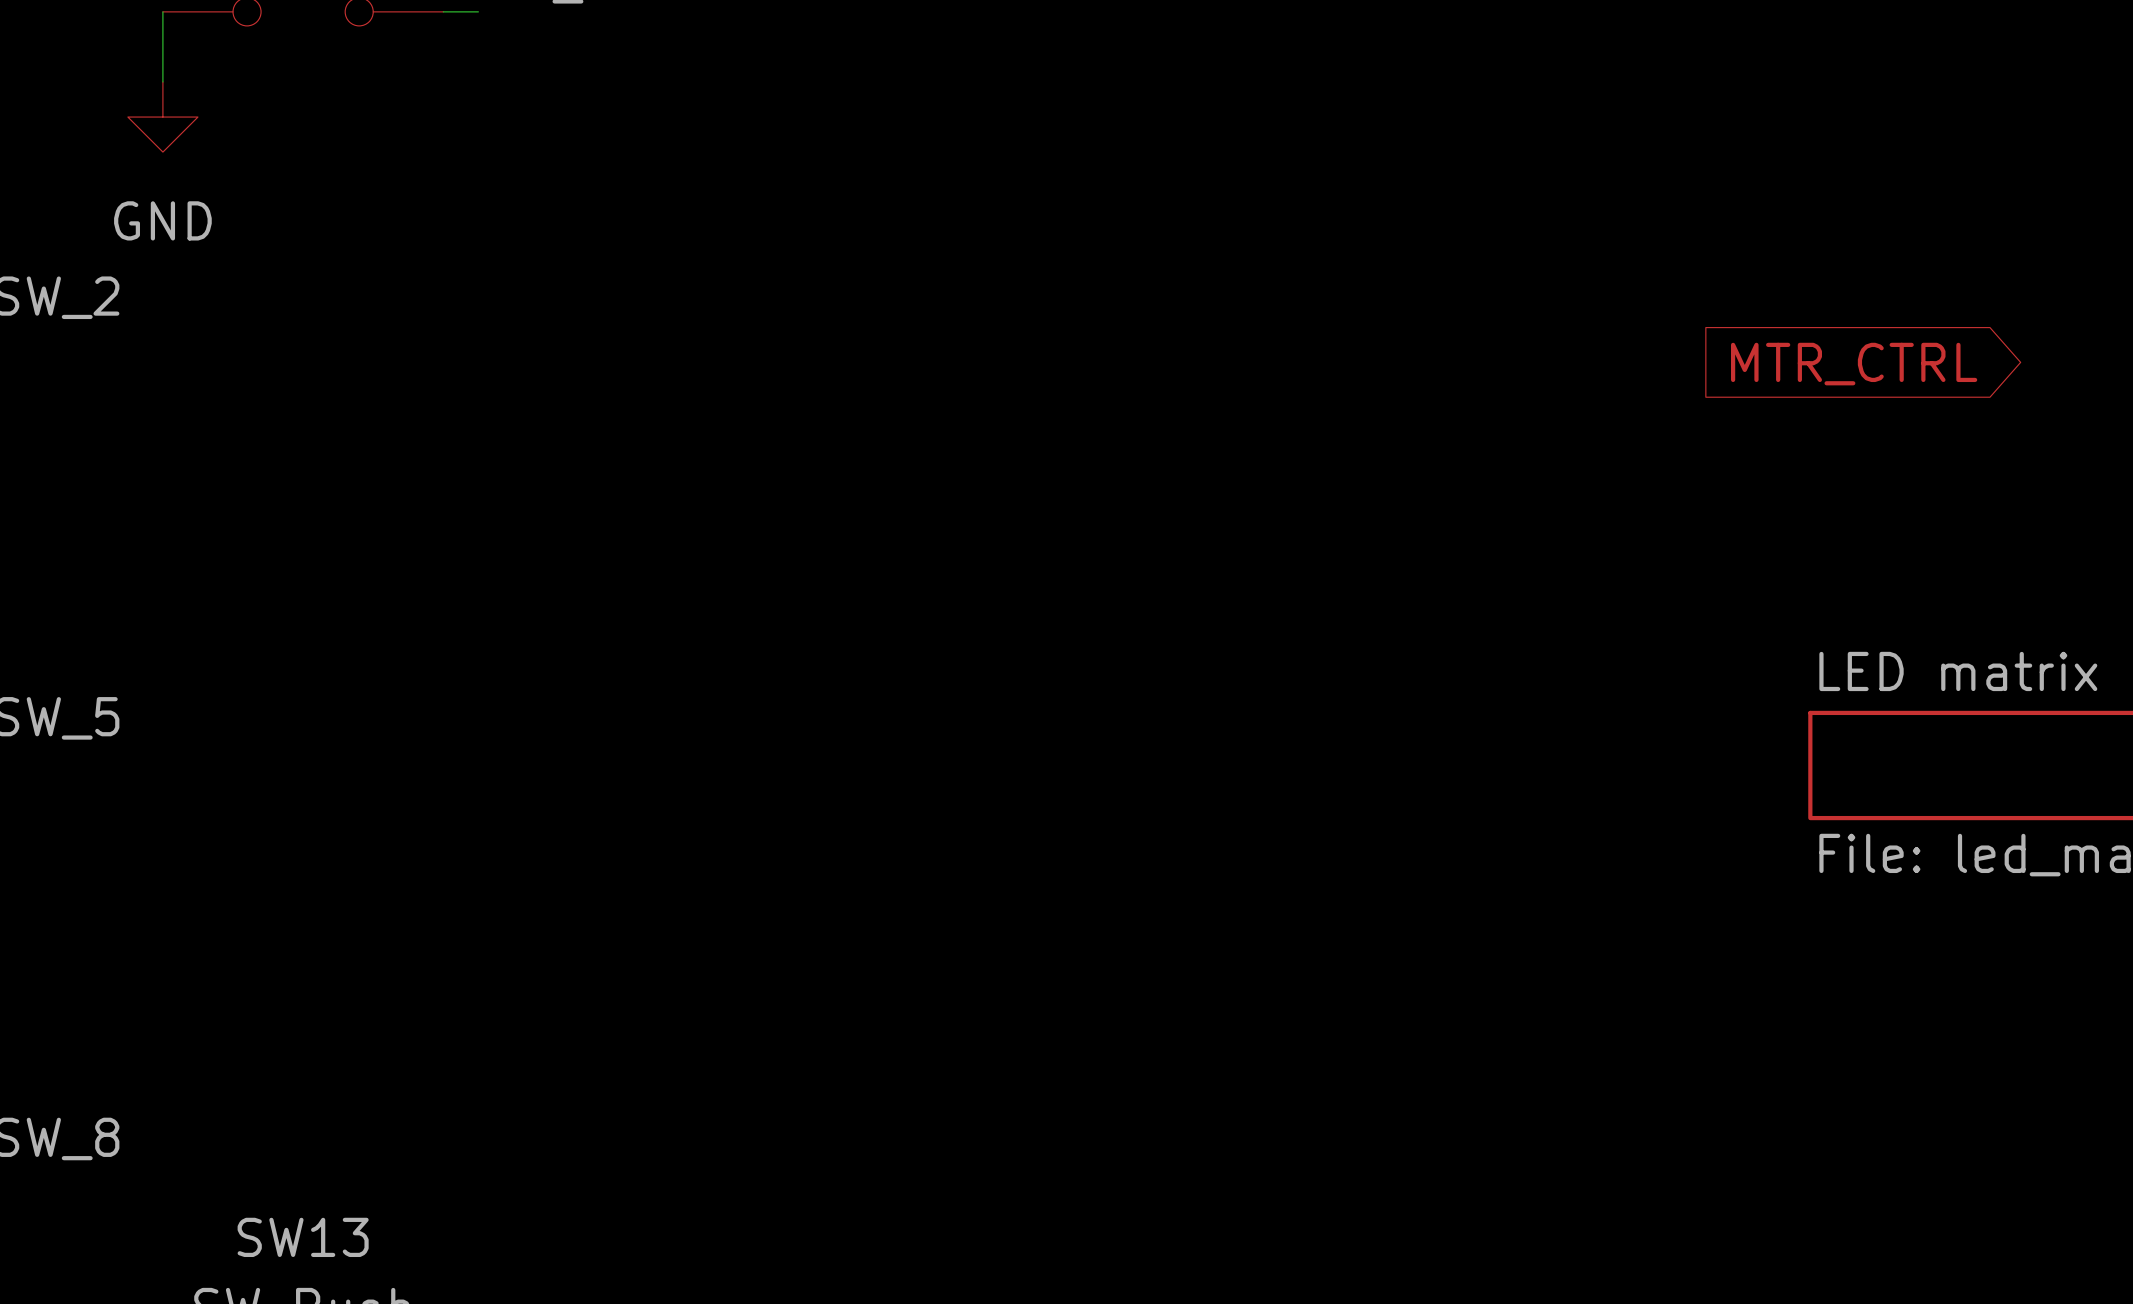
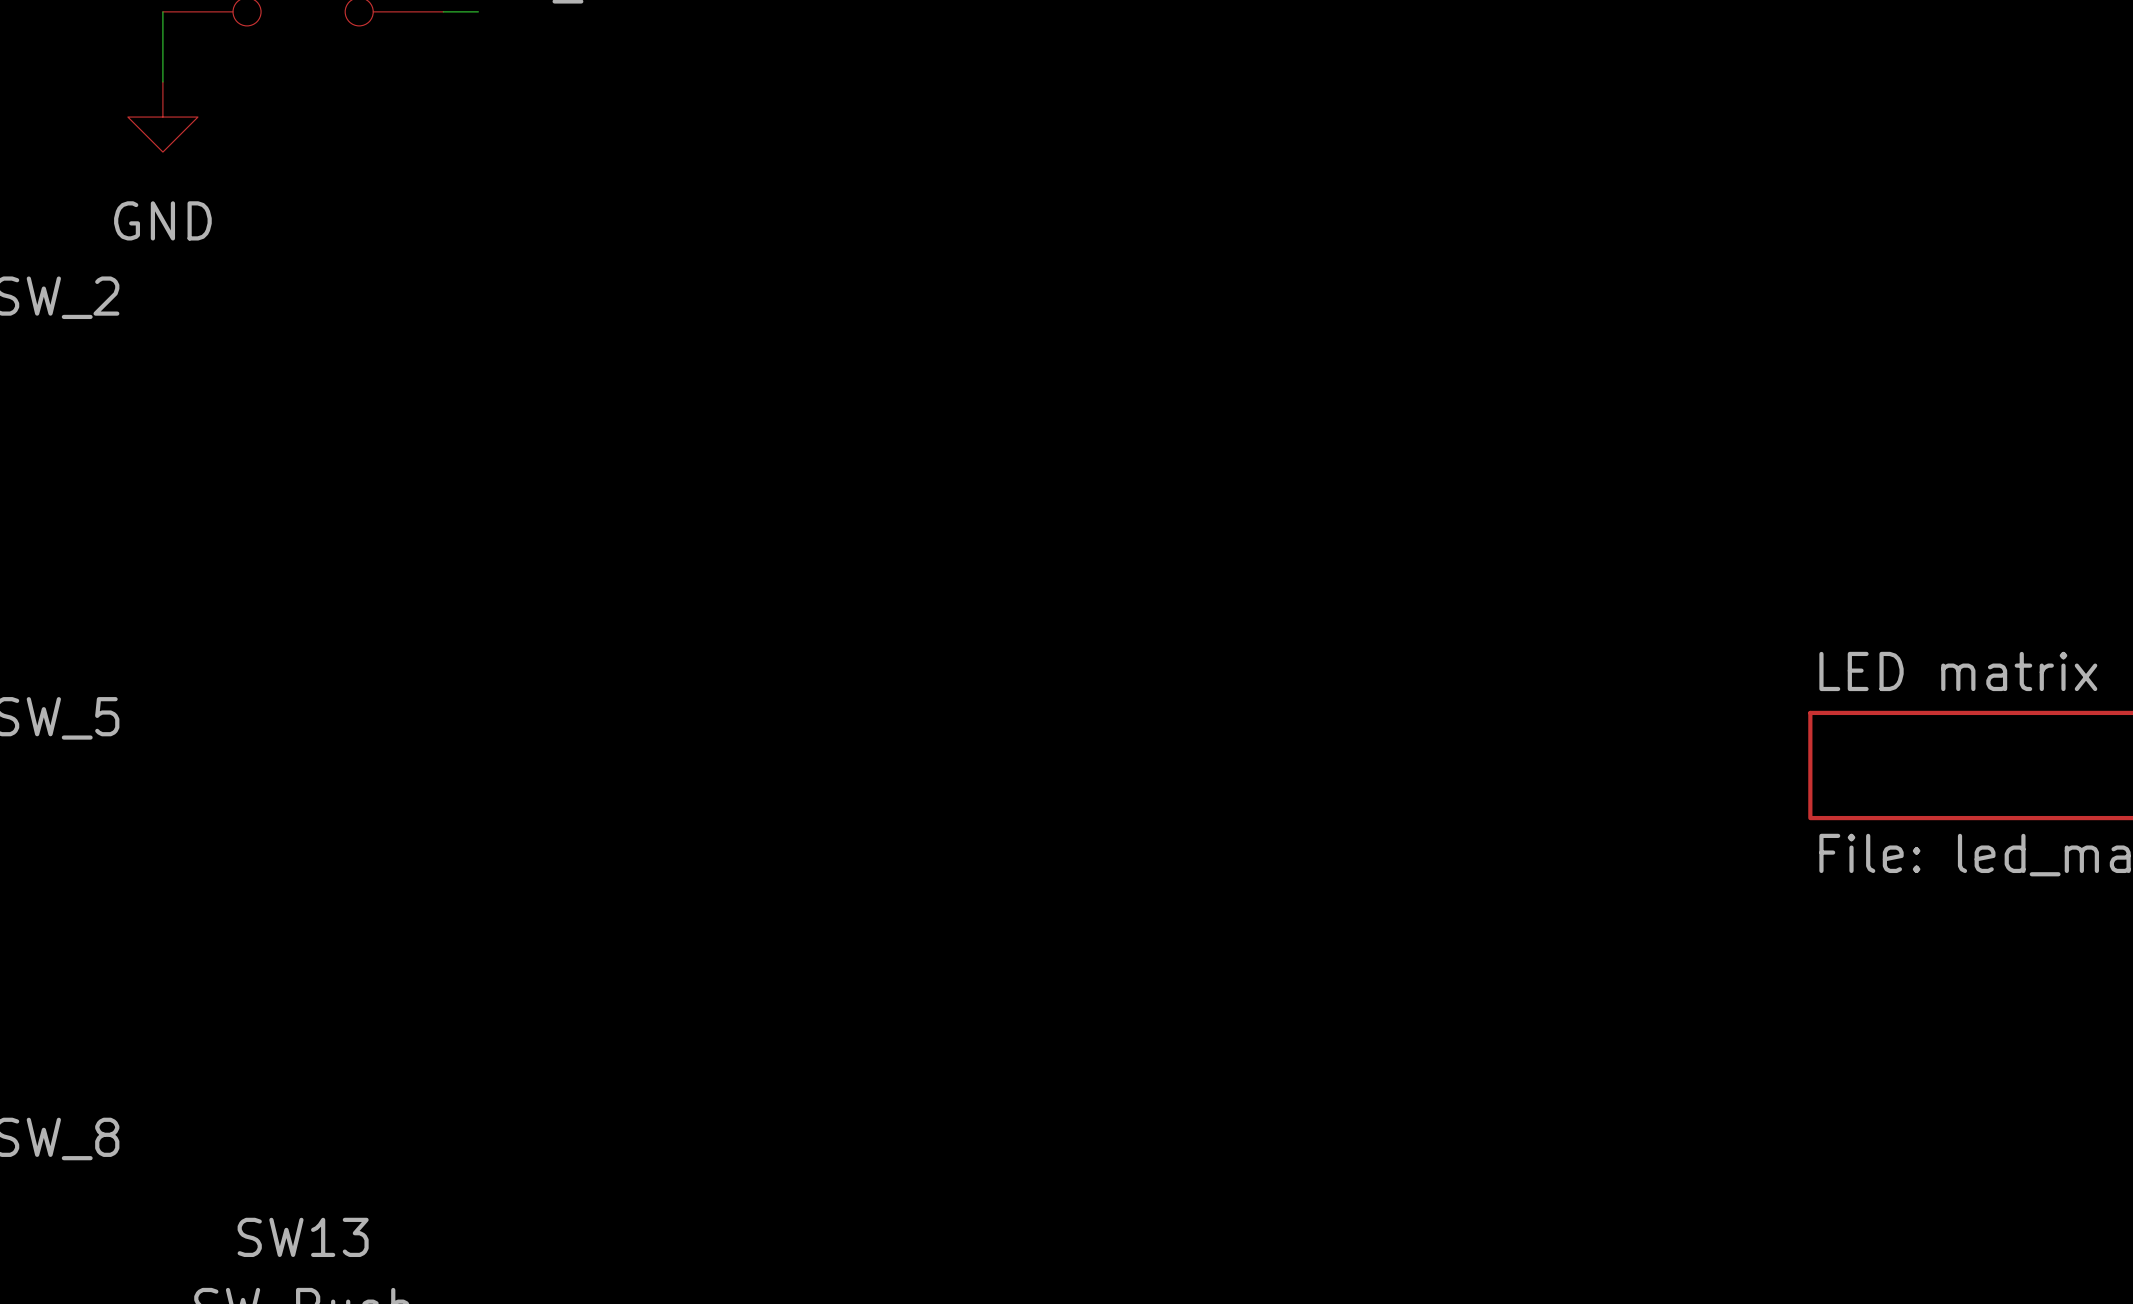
global label: MTR_CTRL (1854, 364) -> none

